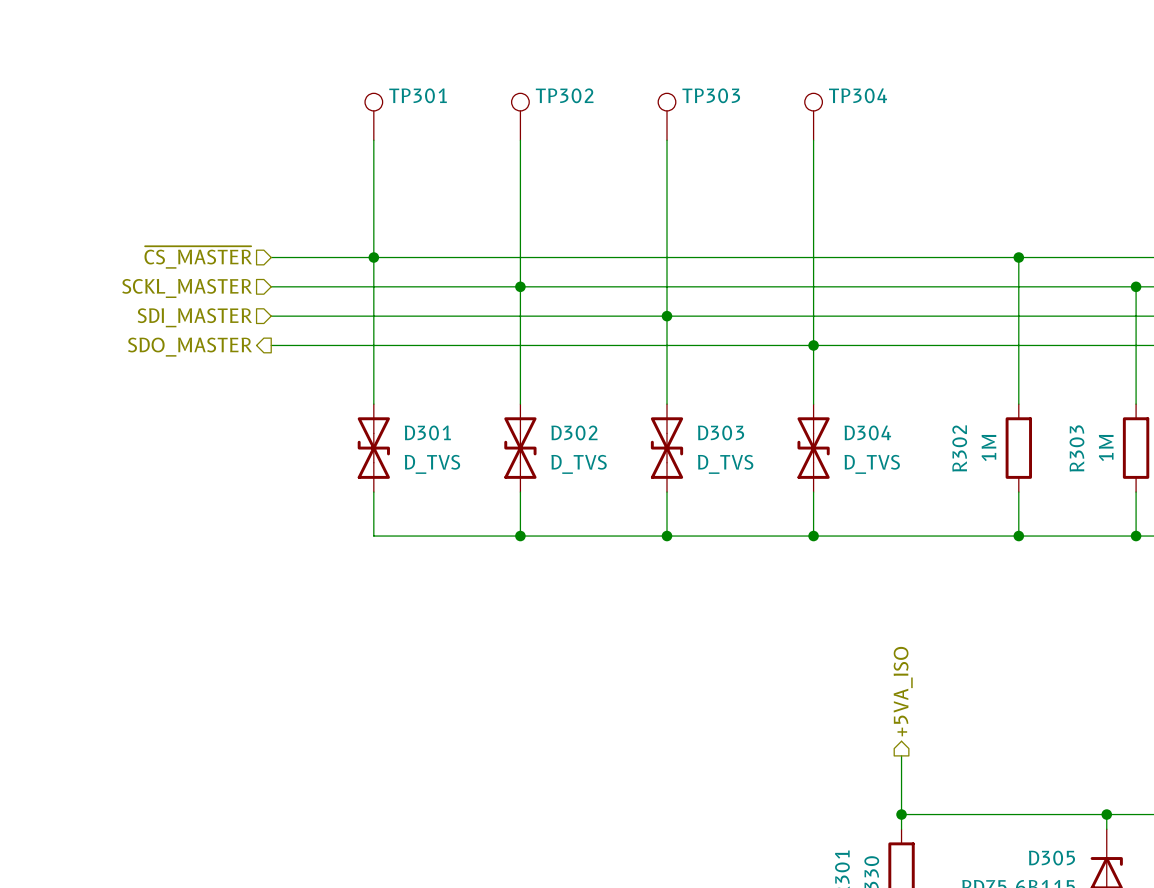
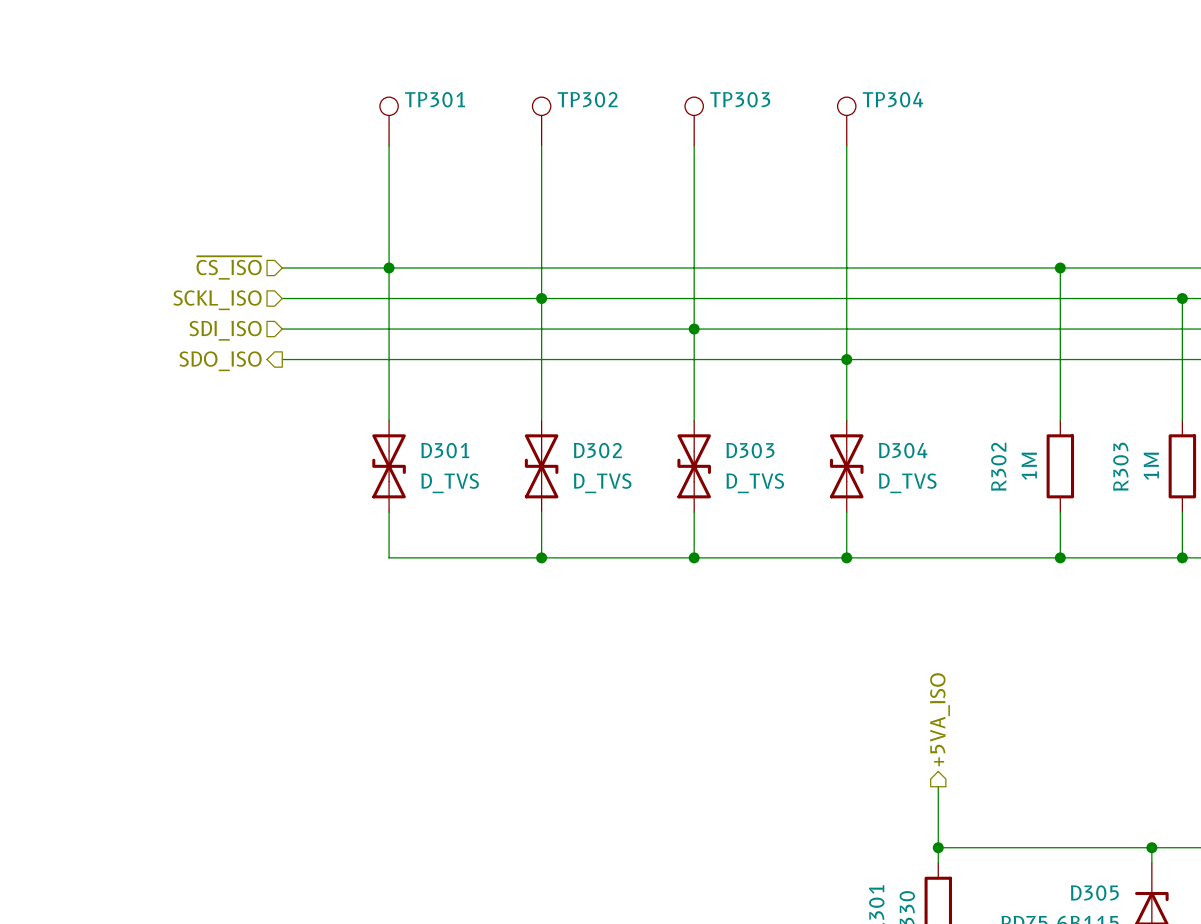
hierarchical label: ~{CS_MASTER} (198, 257) -> ~{CS_ISO} (229, 267)
hierarchical label: SCKL_MASTER (187, 288) -> SCKL_ISO (217, 300)
hierarchical label: SDI_MASTER (194, 317) -> SDI_ISO (225, 330)
hierarchical label: SDO_MASTER (189, 347) -> SDO_ISO (220, 361)

